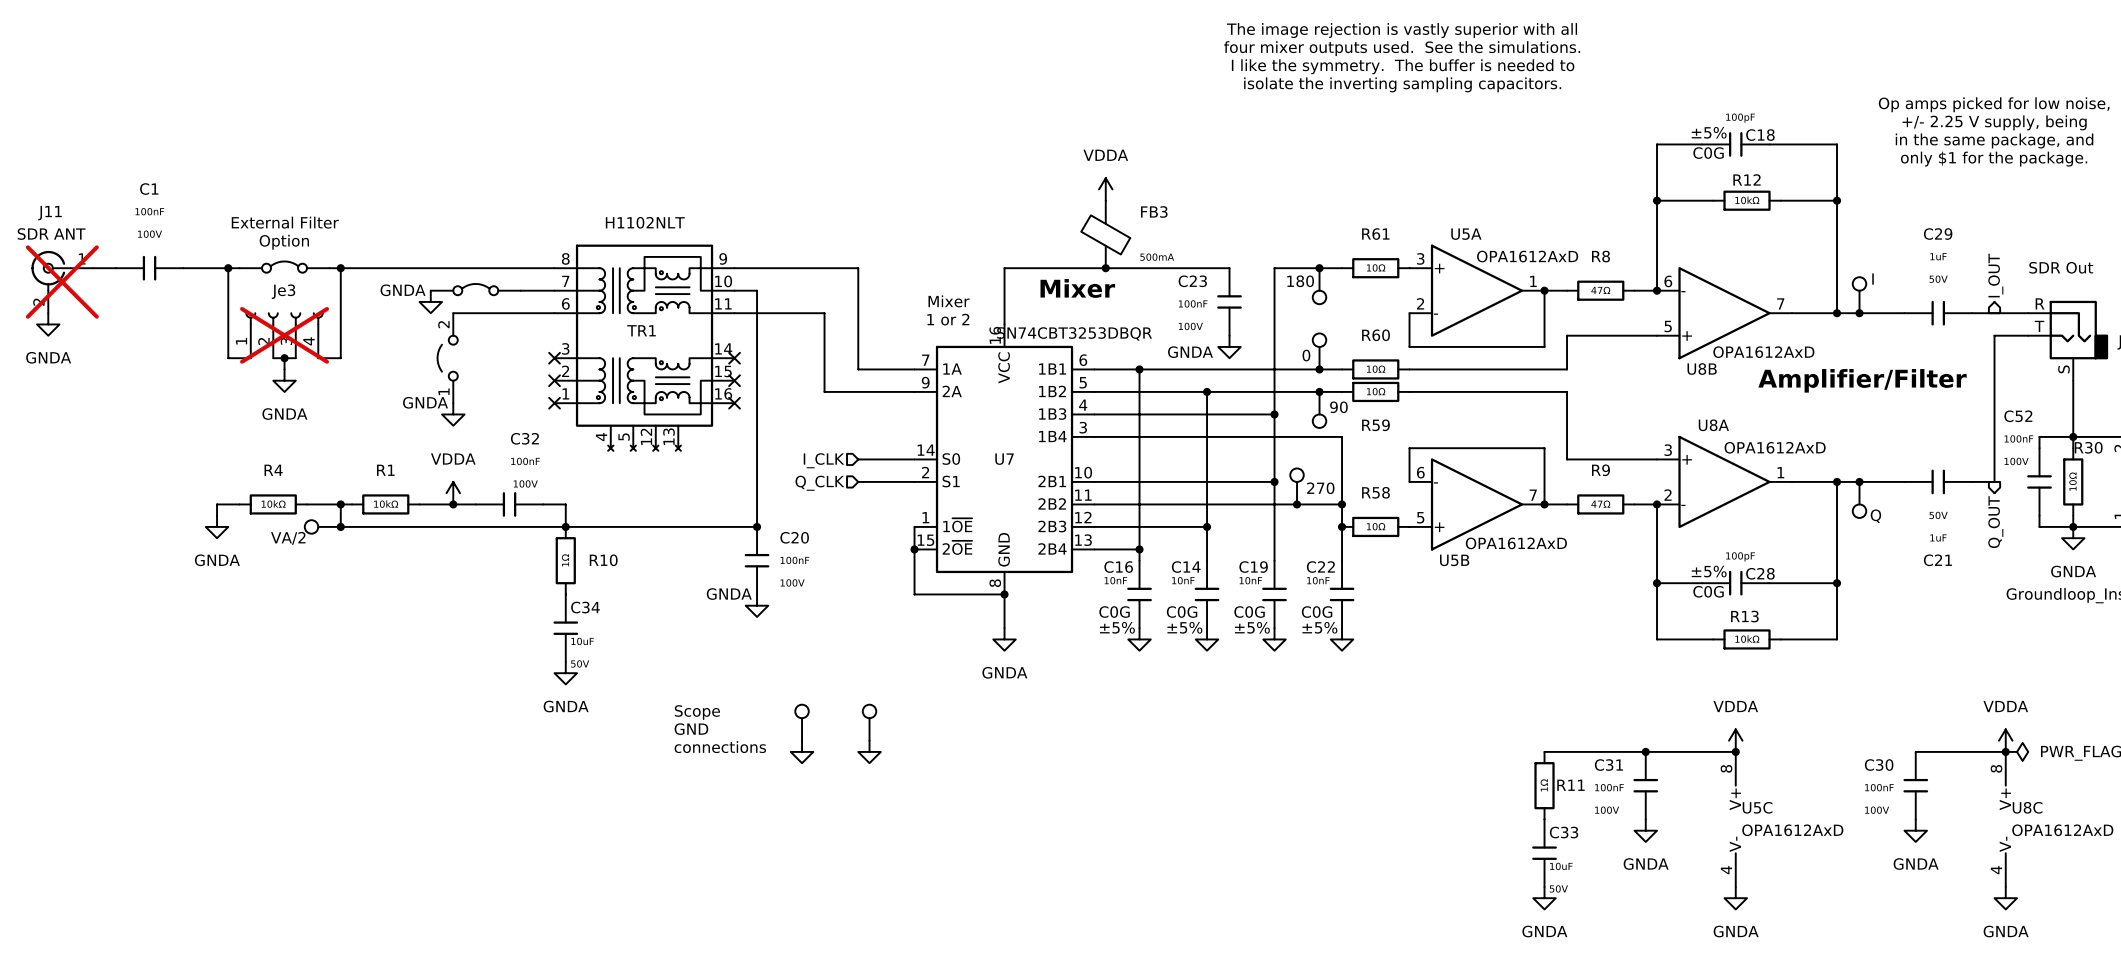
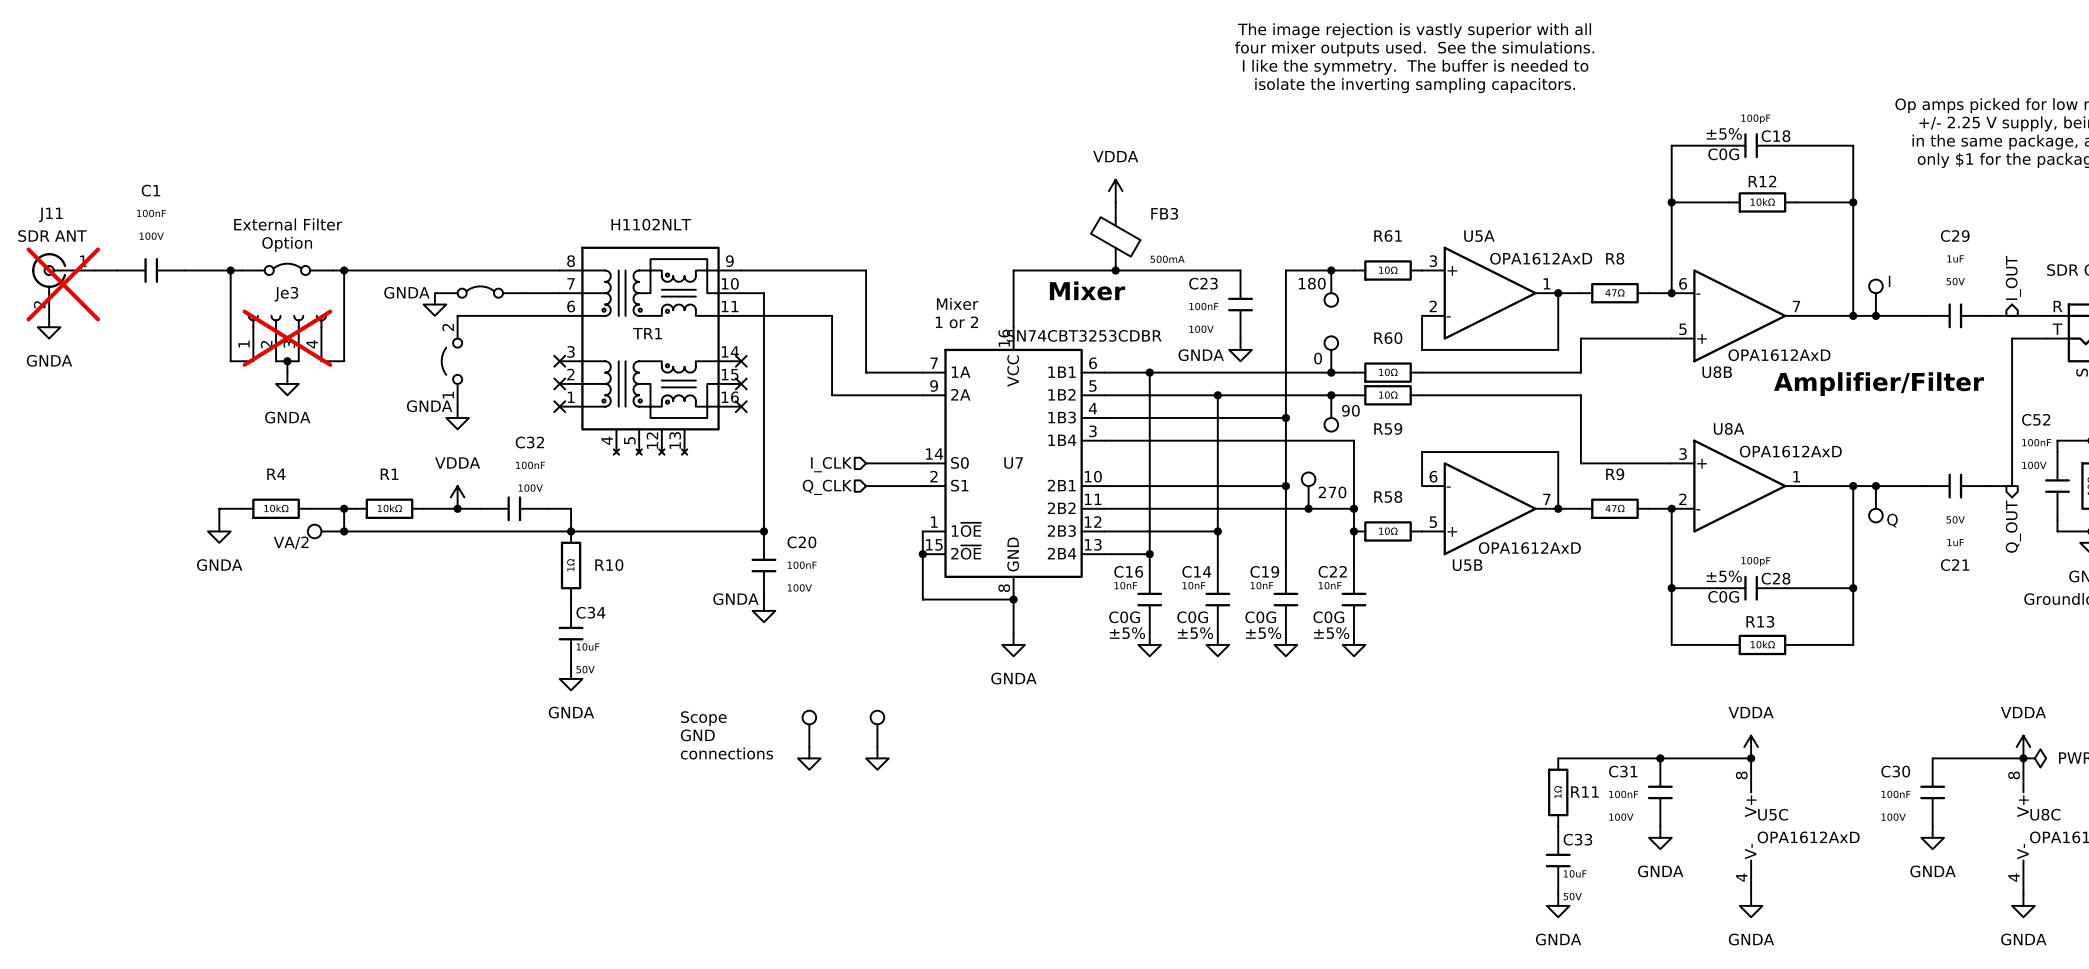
U7 value: SN74CBT3253DBQR (1074, 333) -> SN74CBT3253CDBR (1084, 335)

